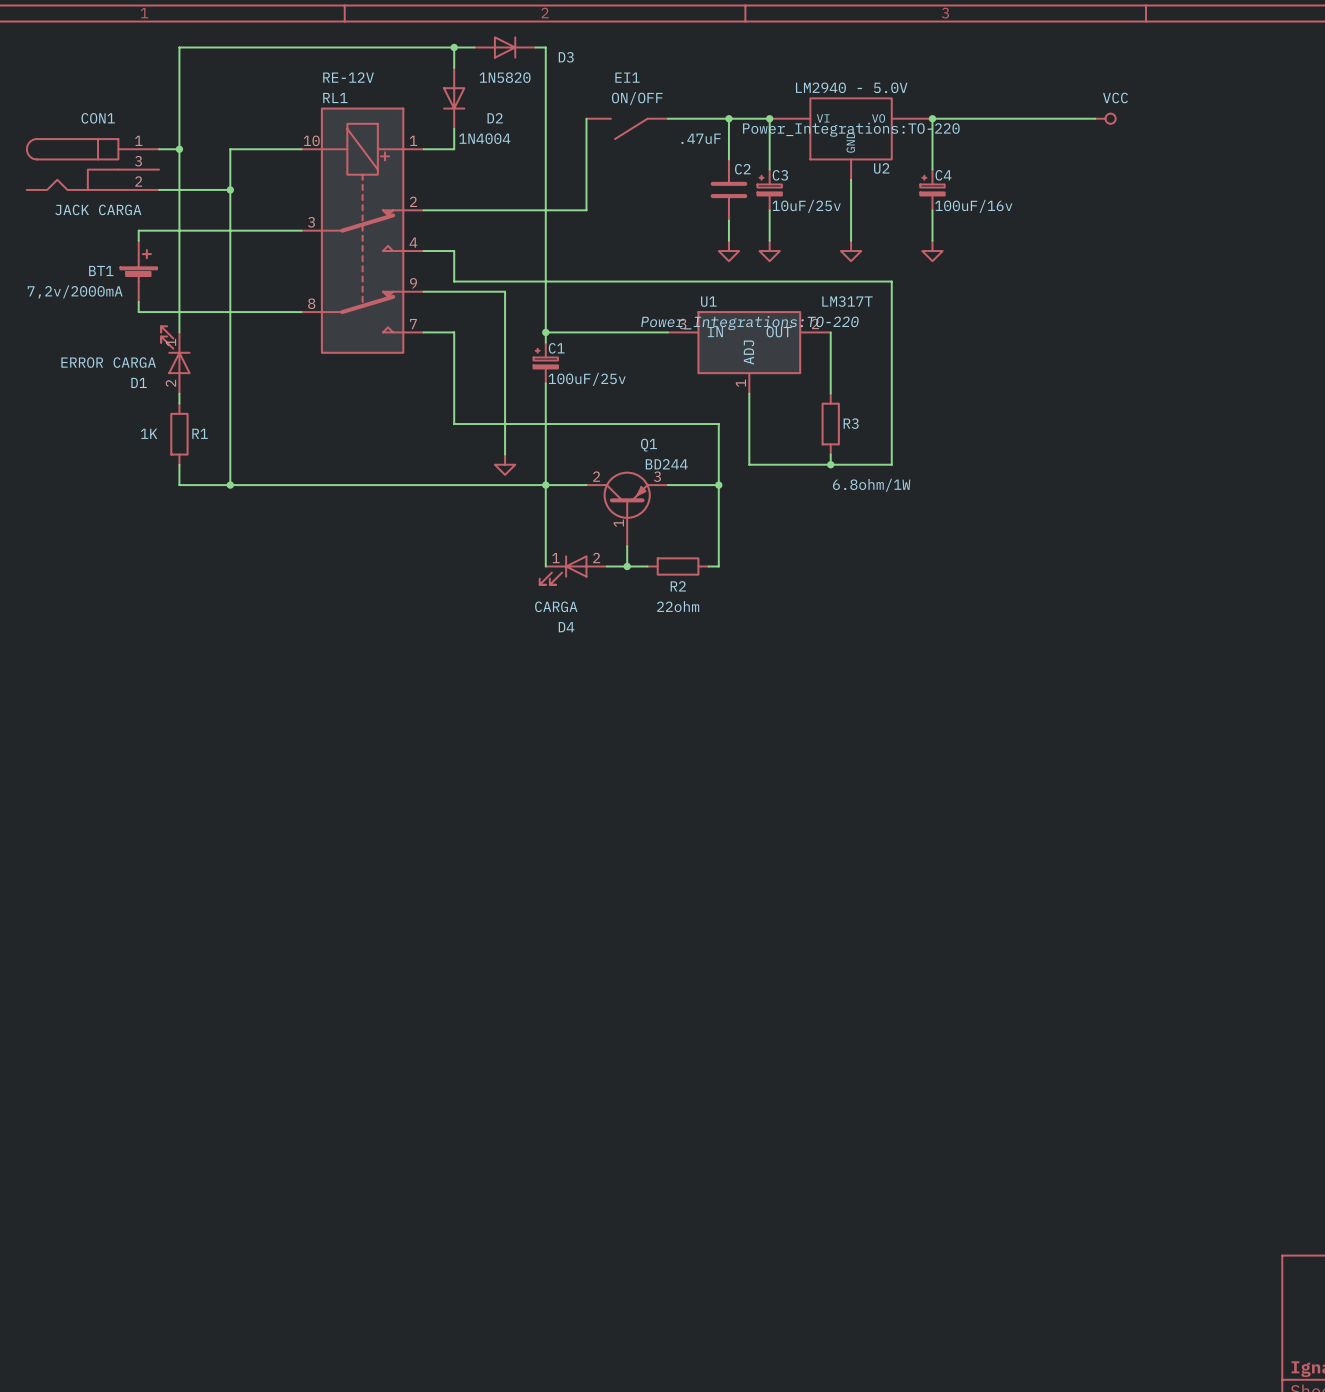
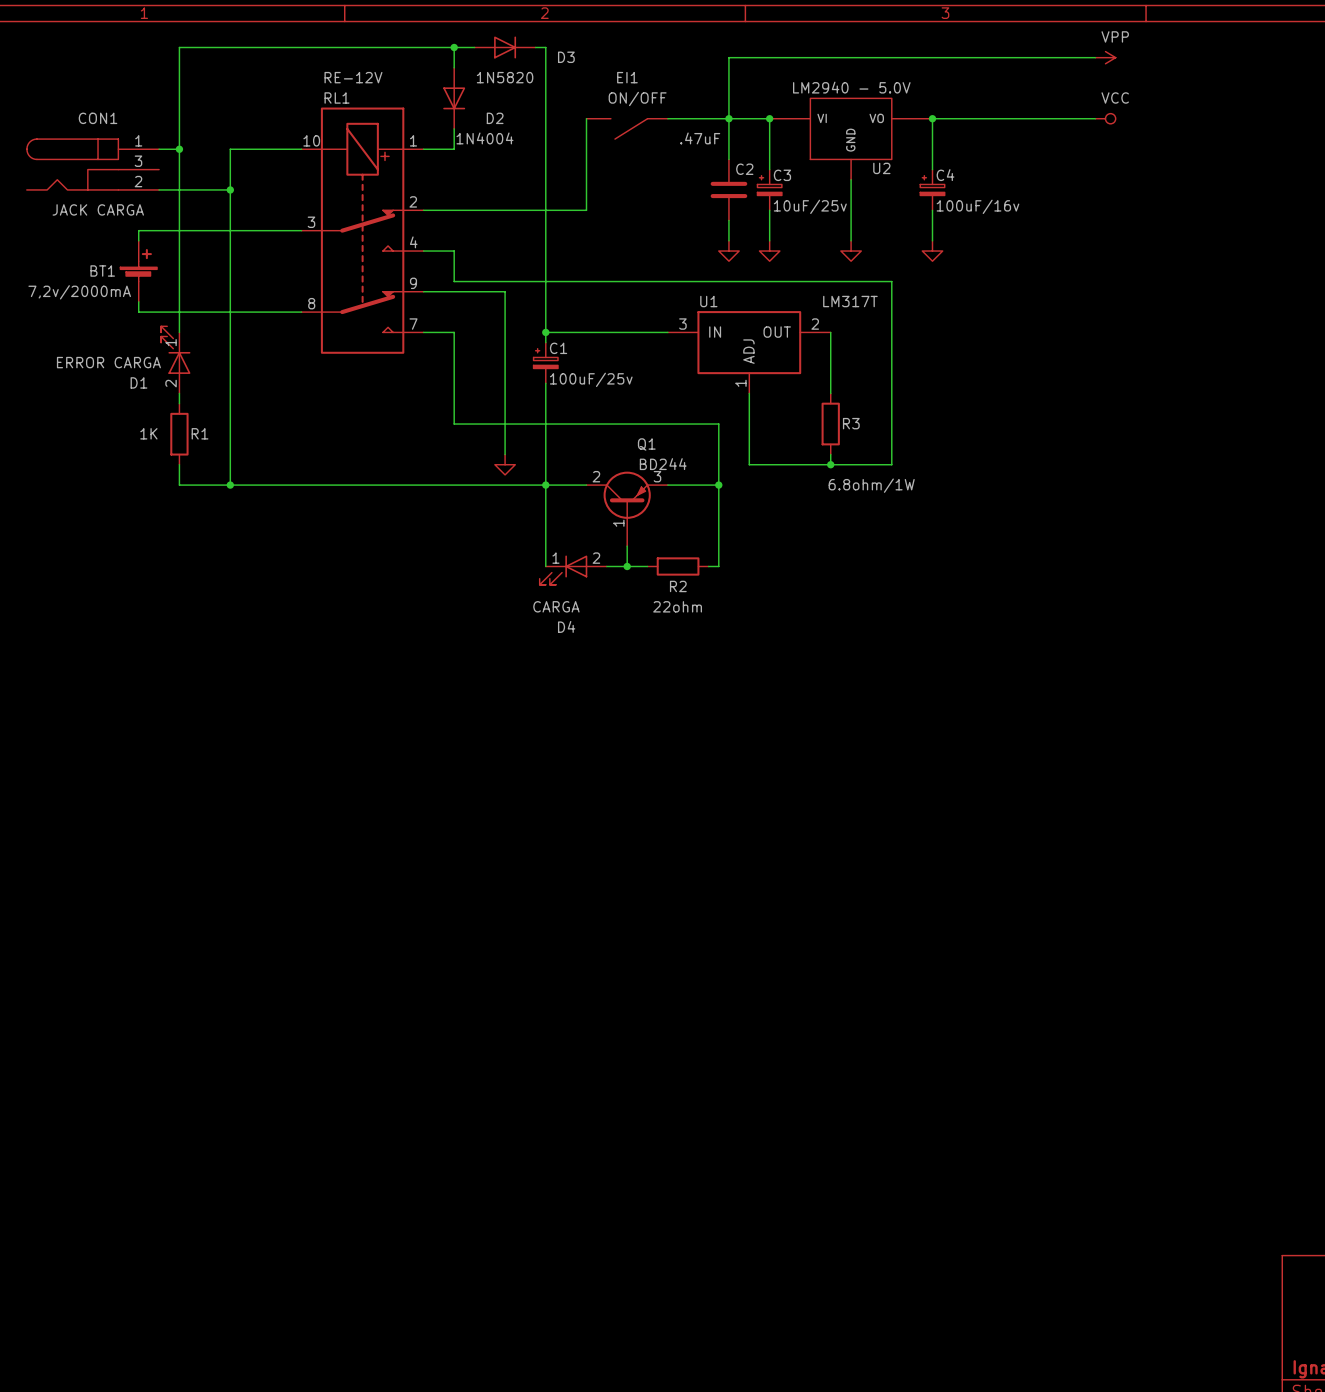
wire: none -> (1095, 57) (728, 57) (728, 118)
power symbol: none -> VPP (1105, 57)
U2 text: Power_Integrations:TO-220 (851, 129) -> none
U1 text: Power_Integrations:TO-220 (749, 323) -> none

